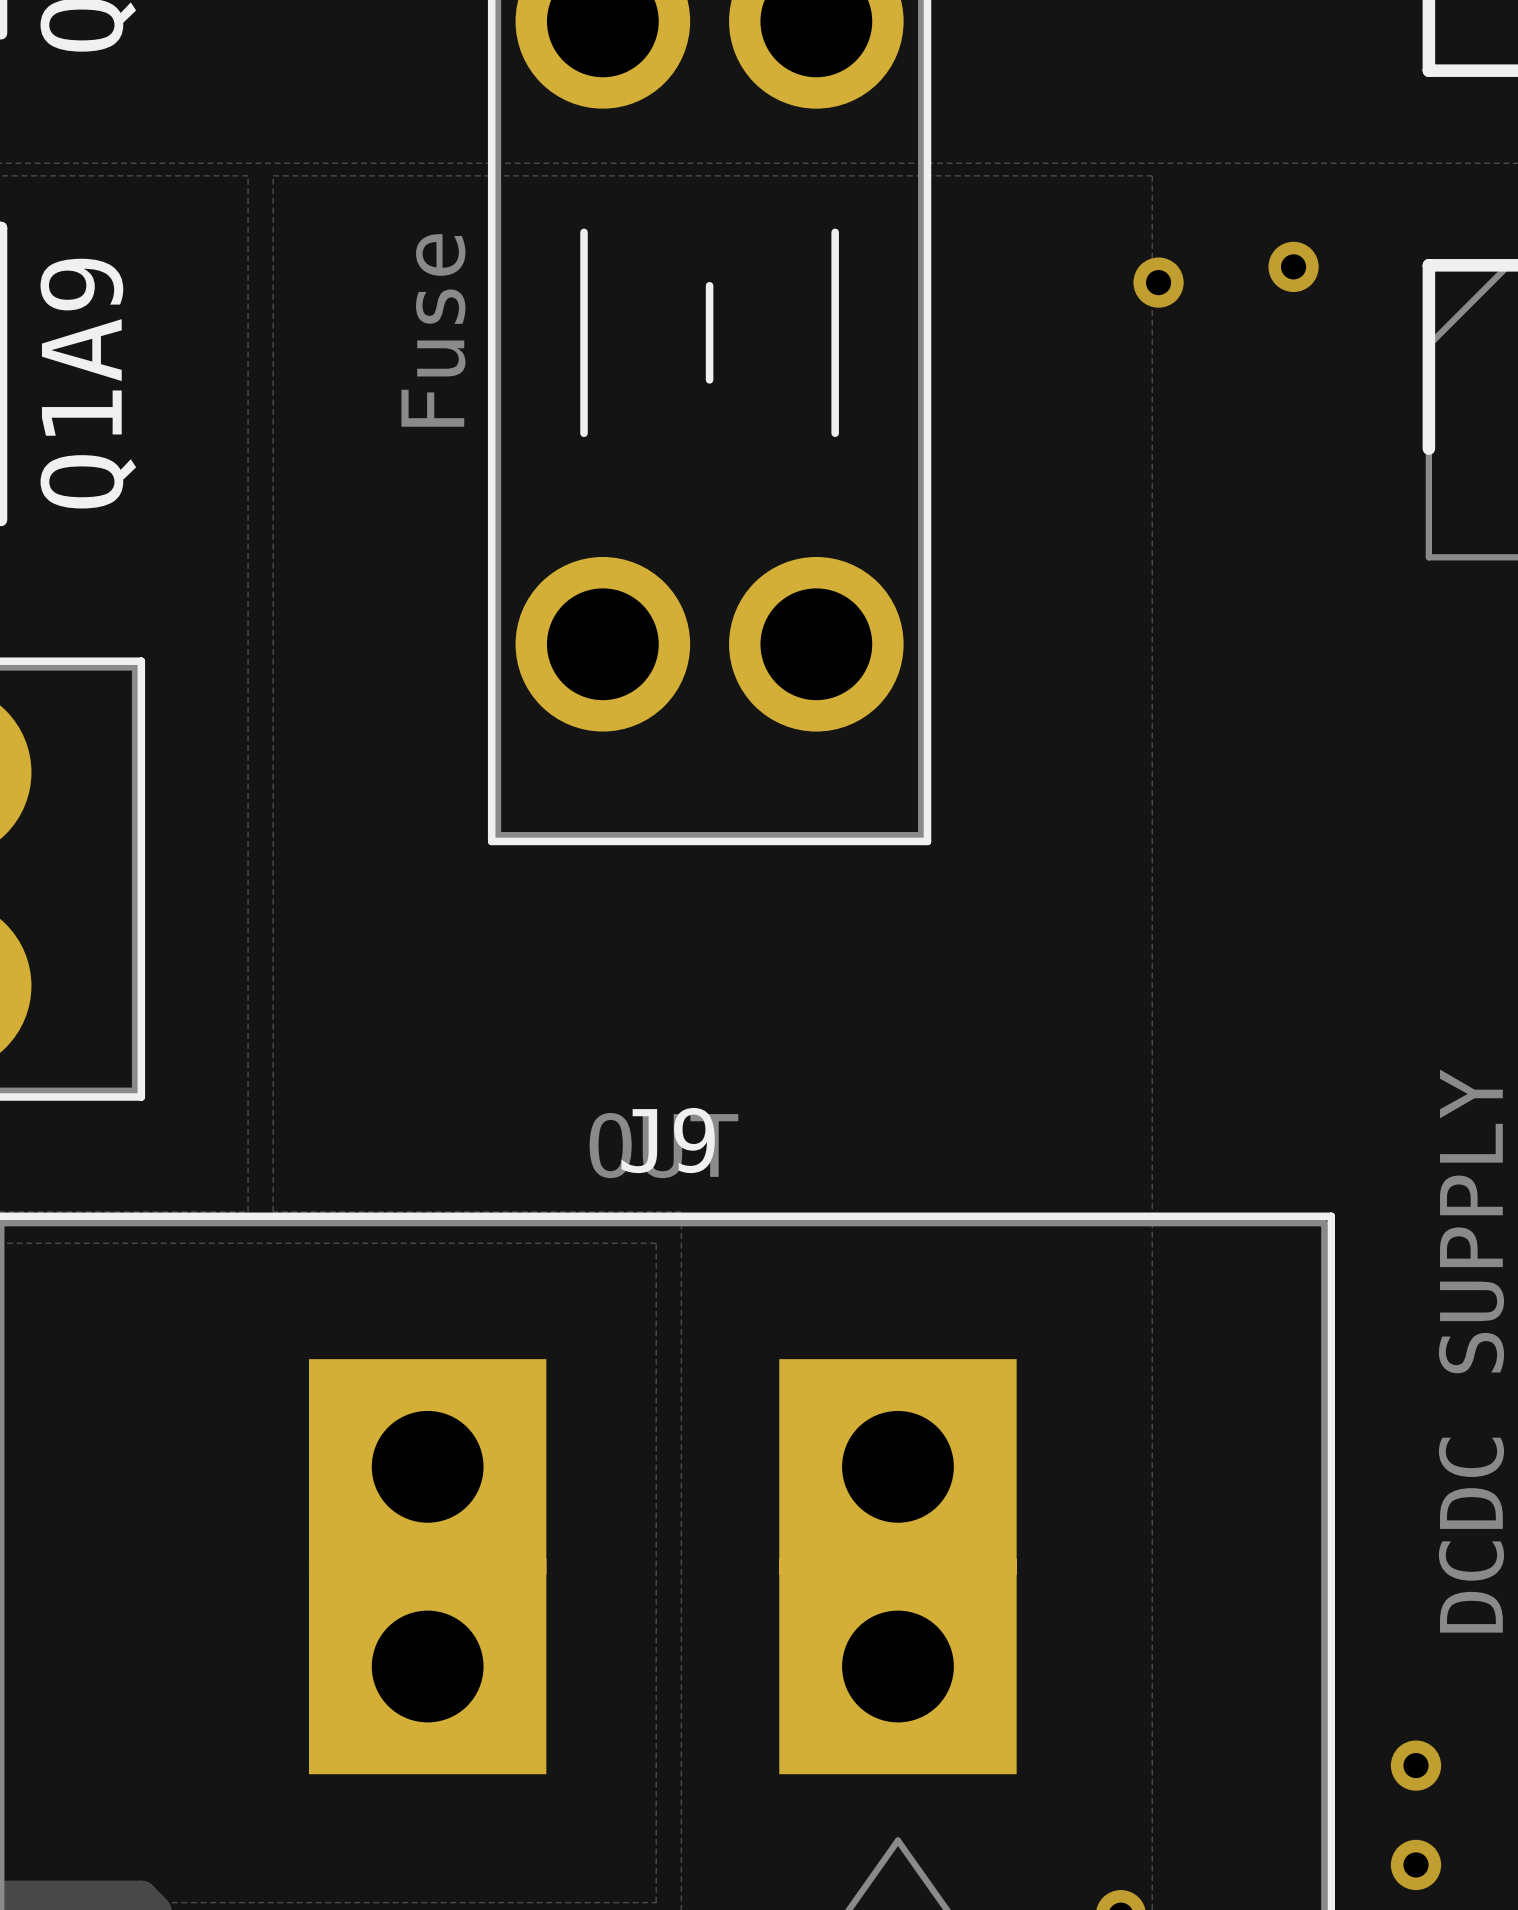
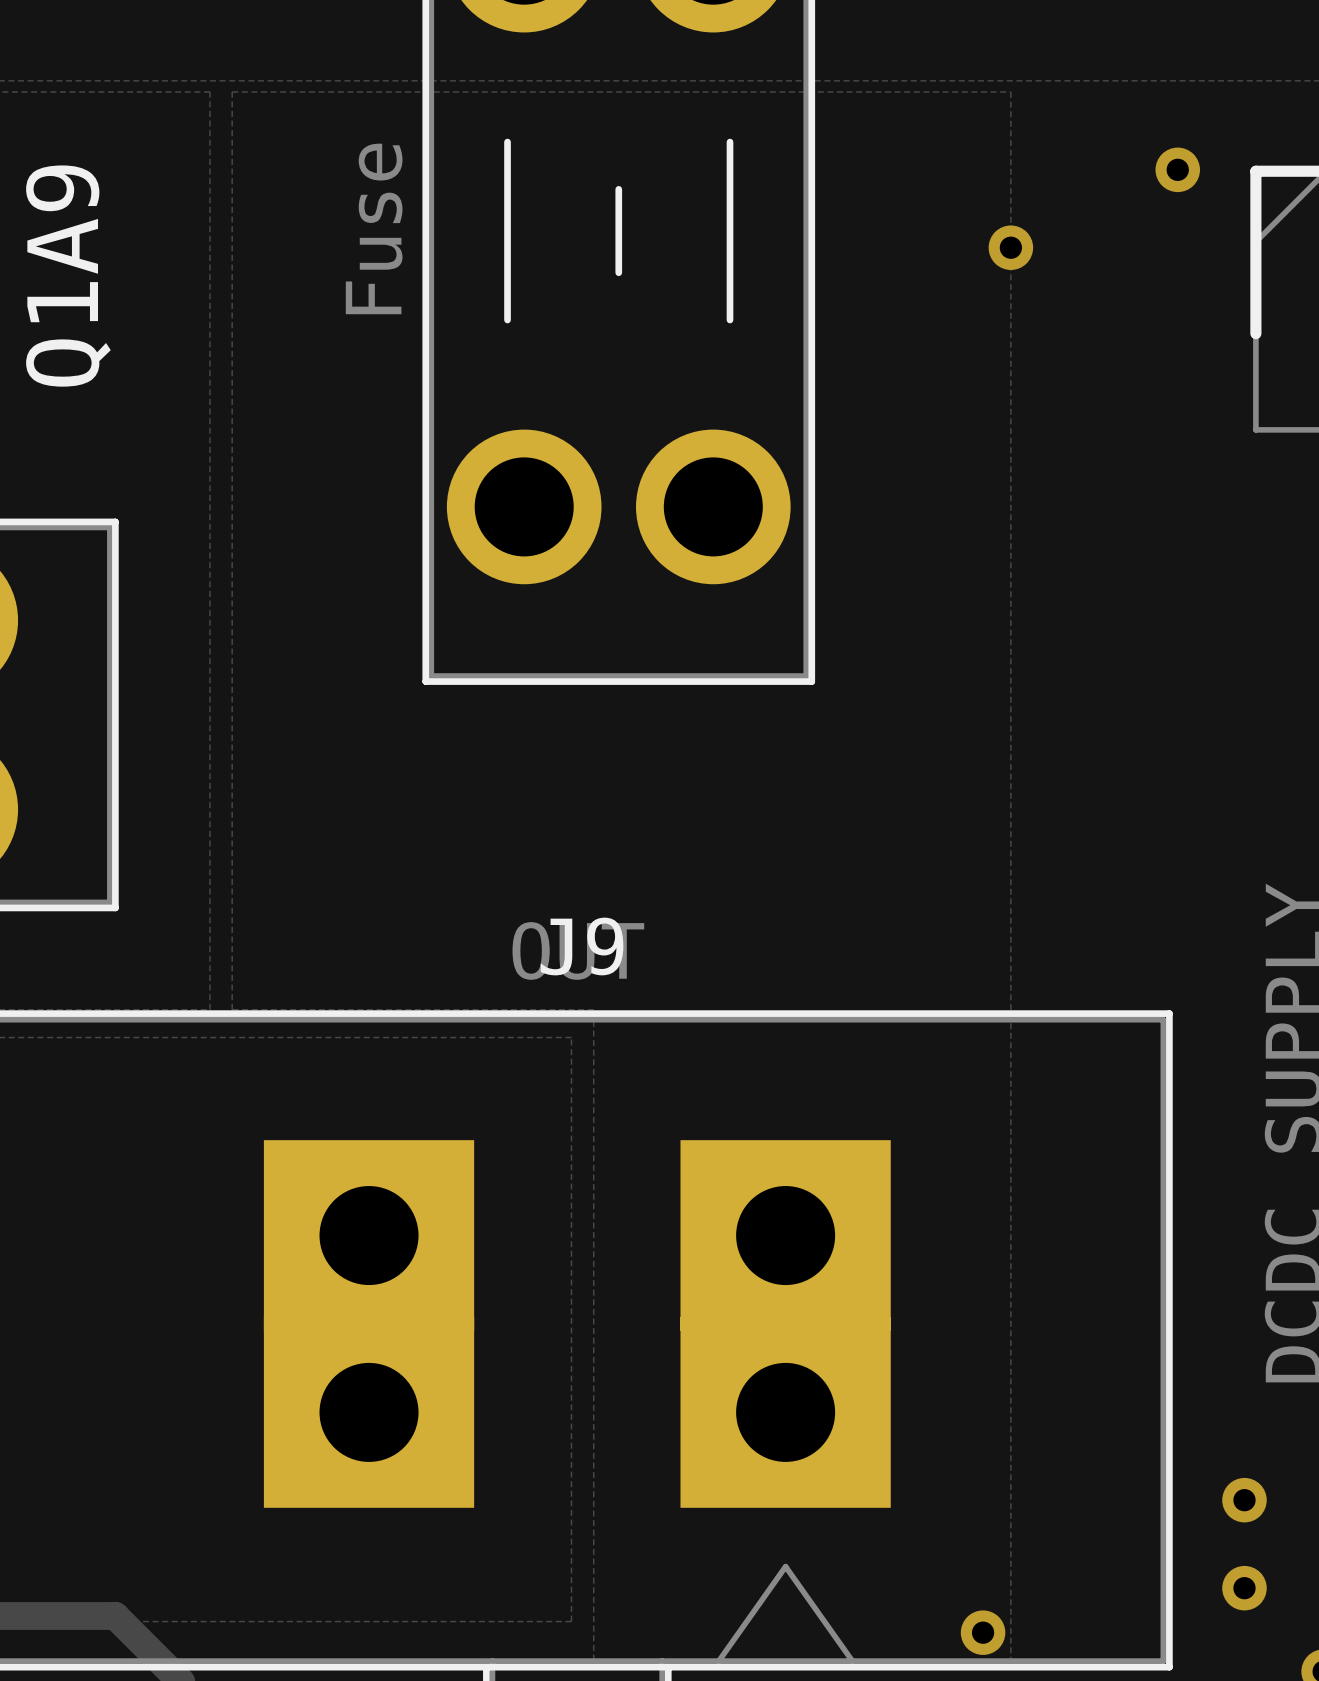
via position: (1293, 266) -> (1177, 169)
via position: (1158, 282) -> (1010, 247)

